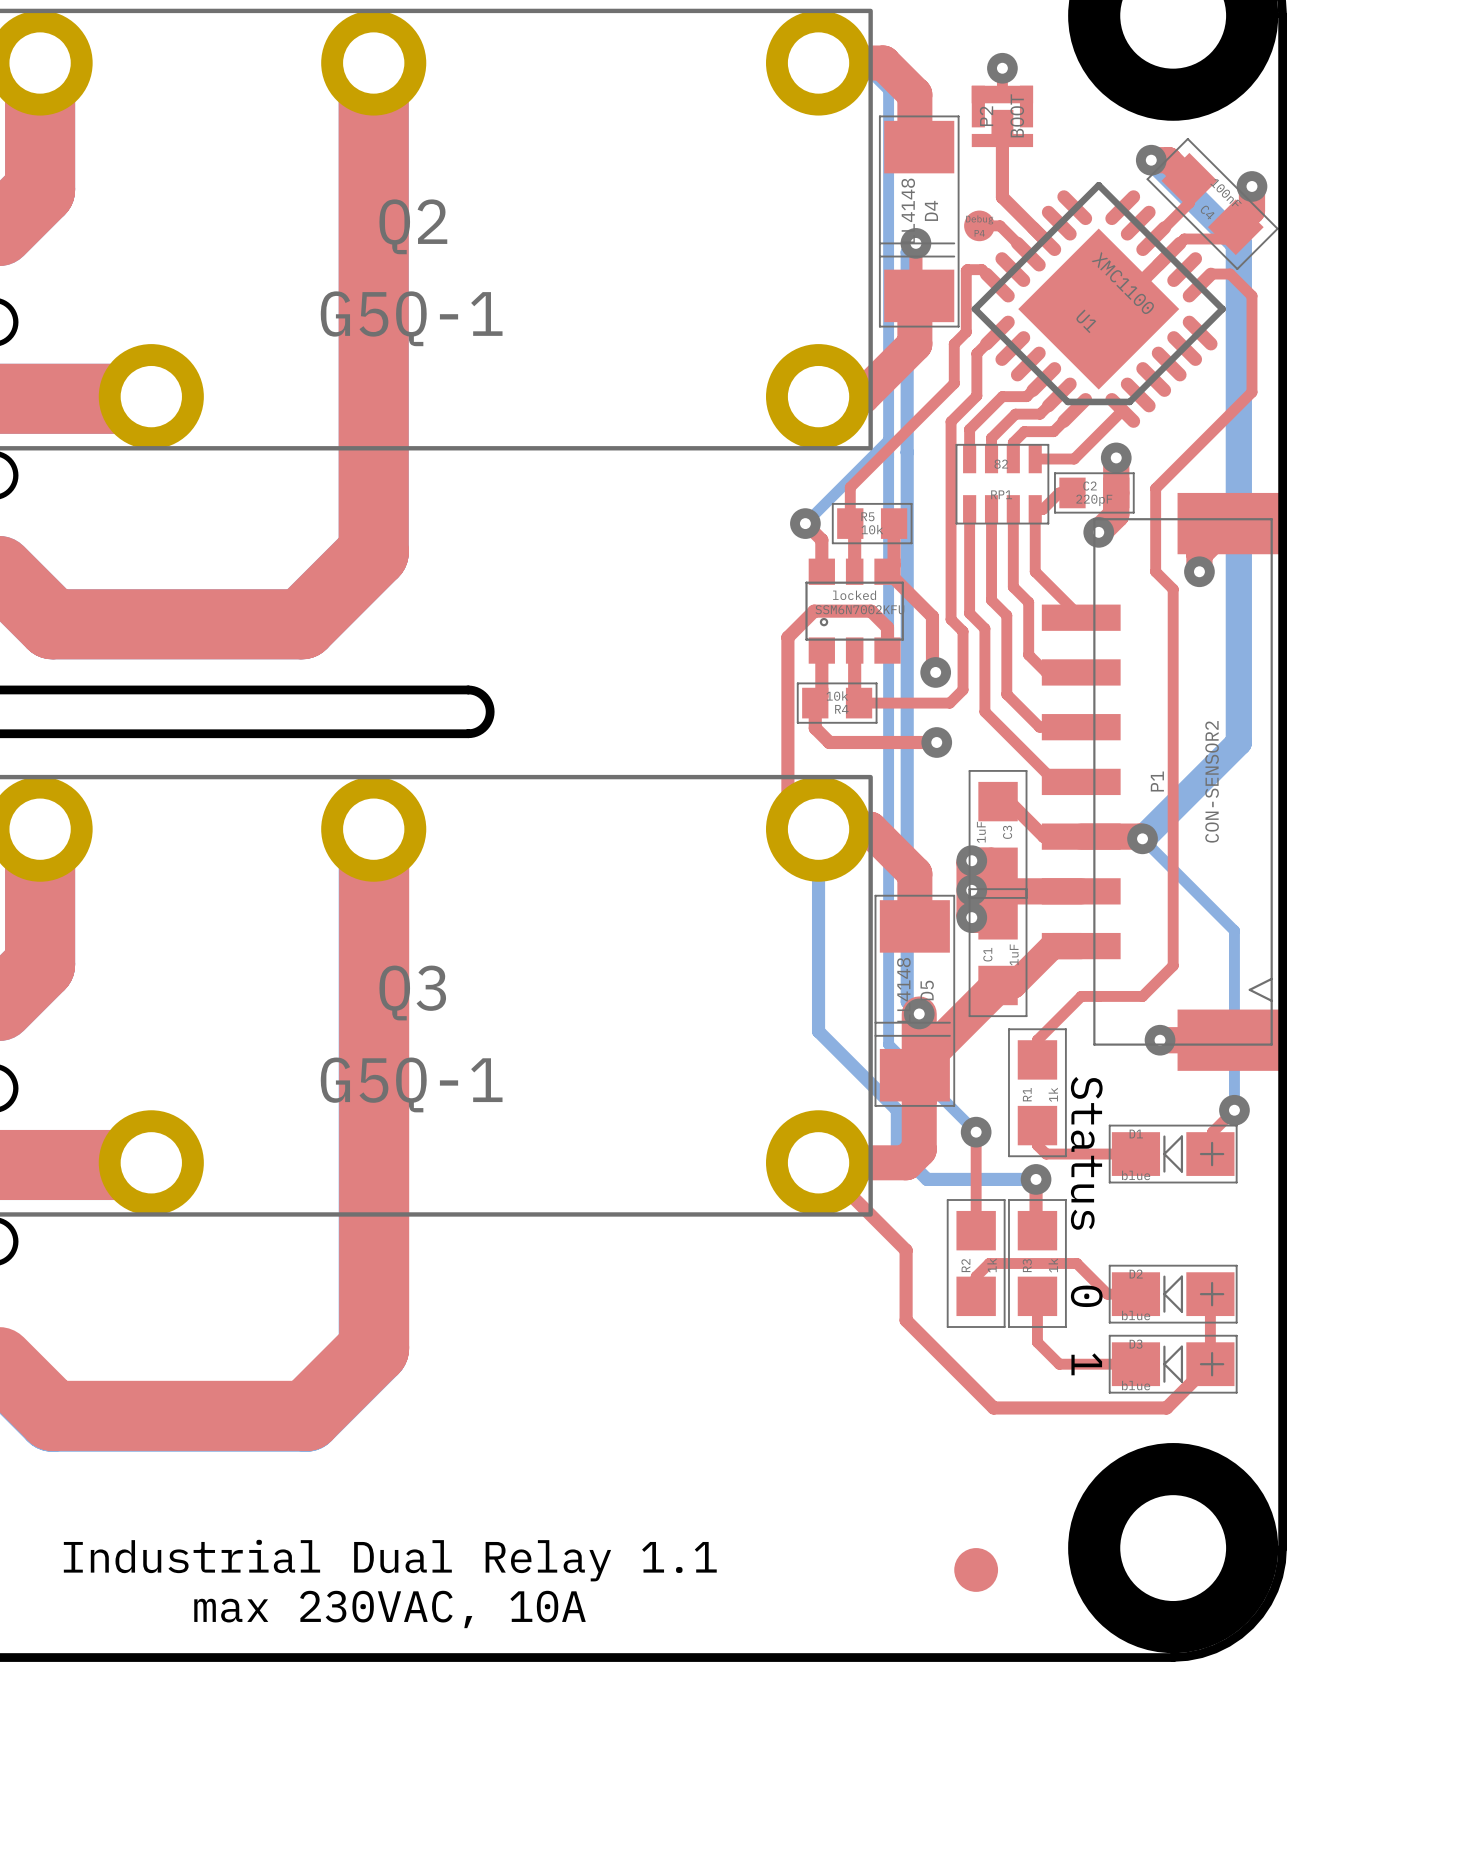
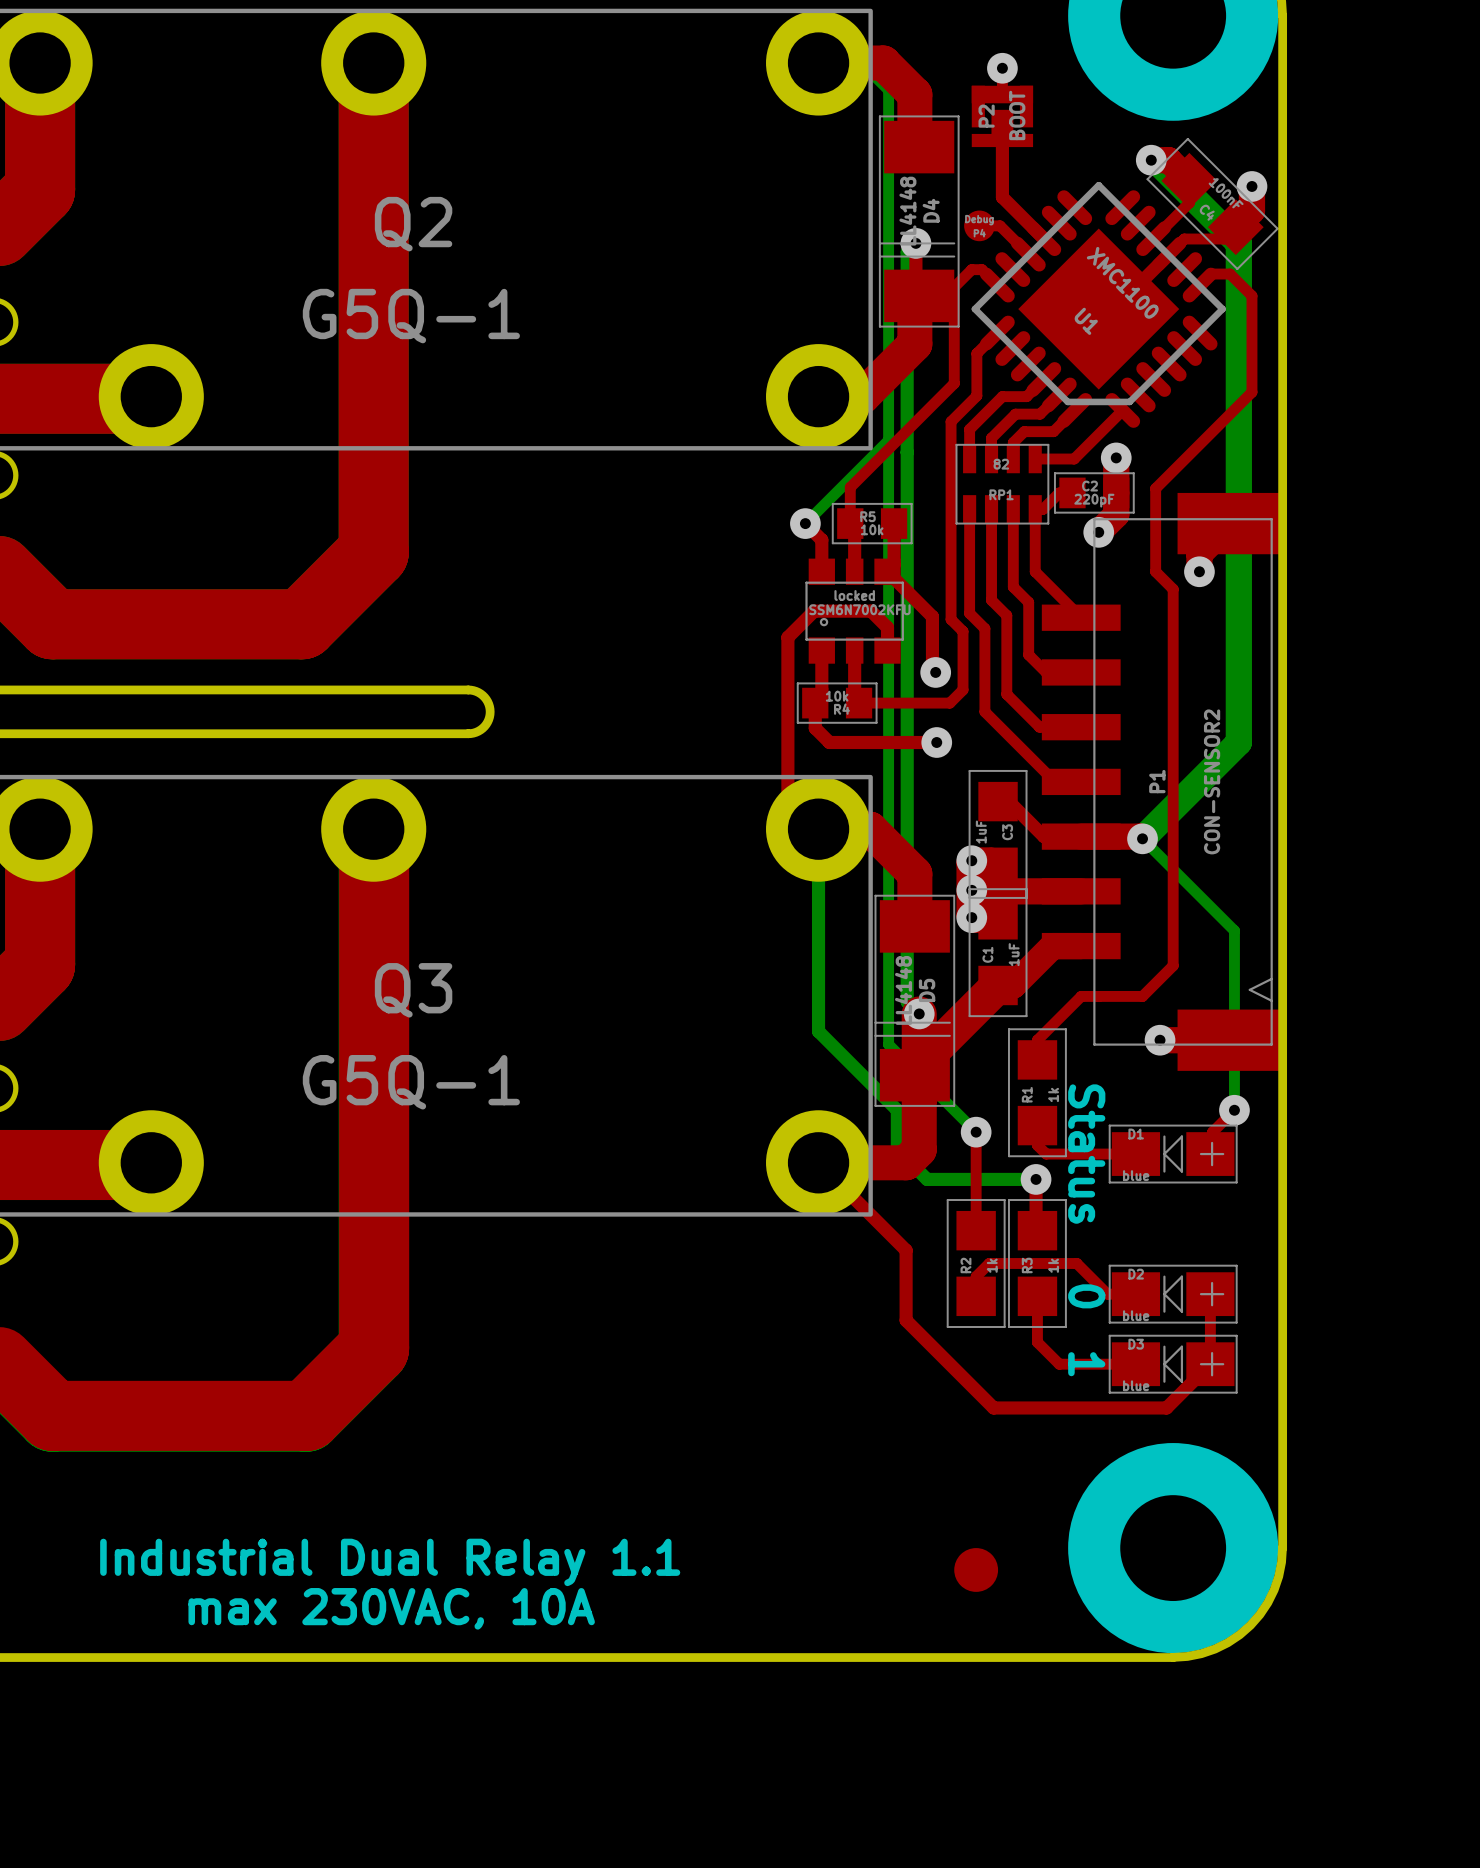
top track: (971, 269) (966, 270) (966, 332) (954, 344) -> (971, 269) (954, 287) (954, 344)

